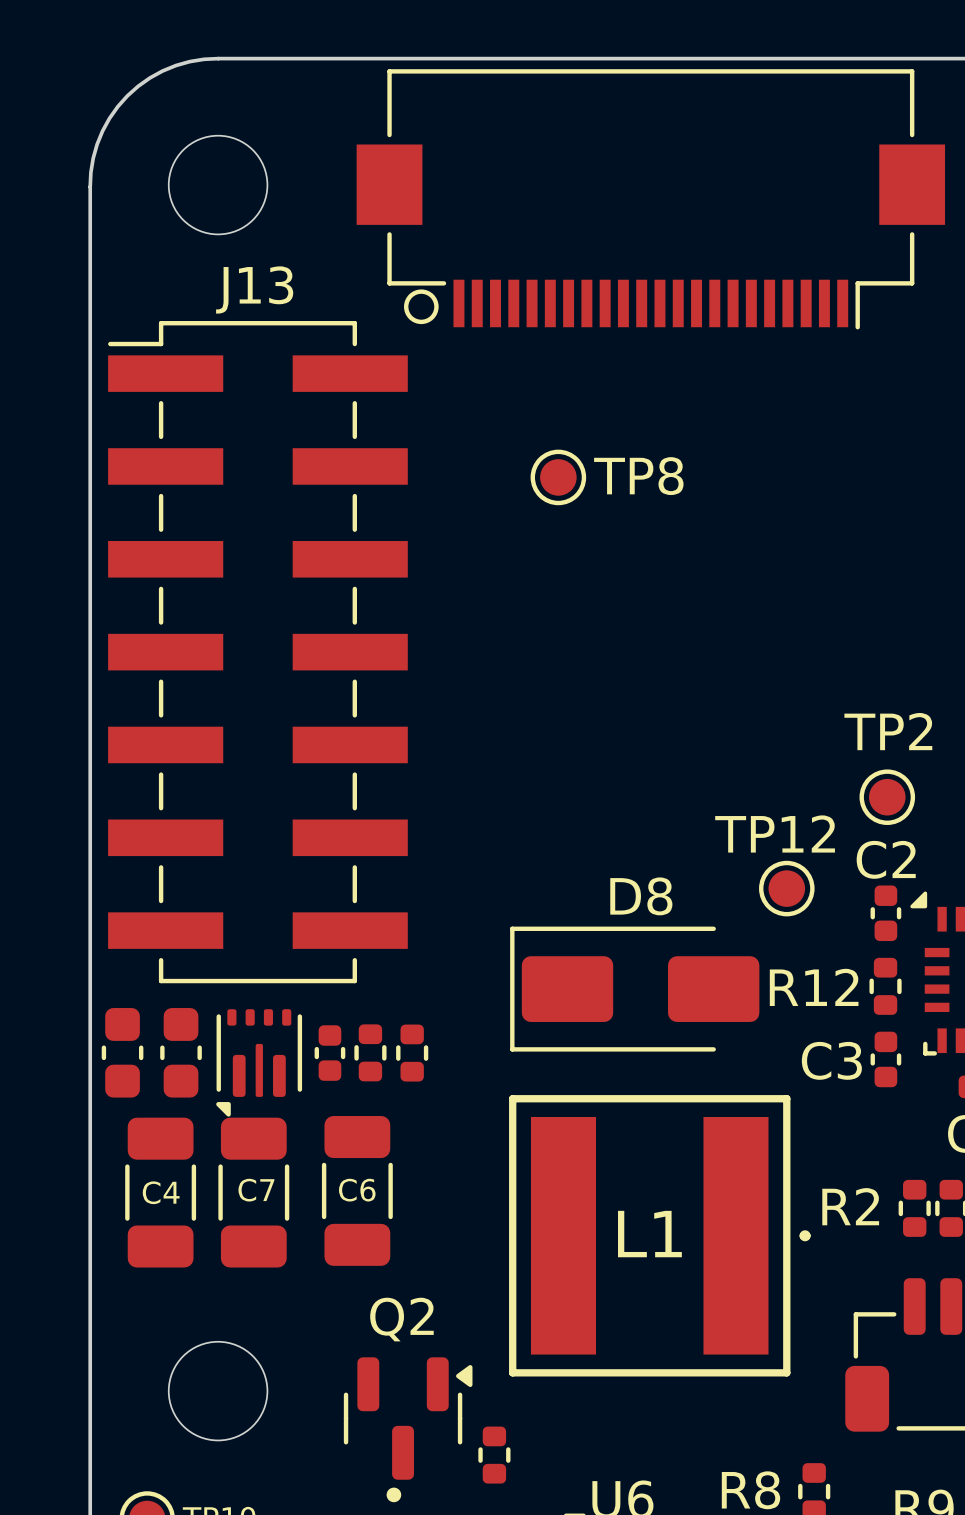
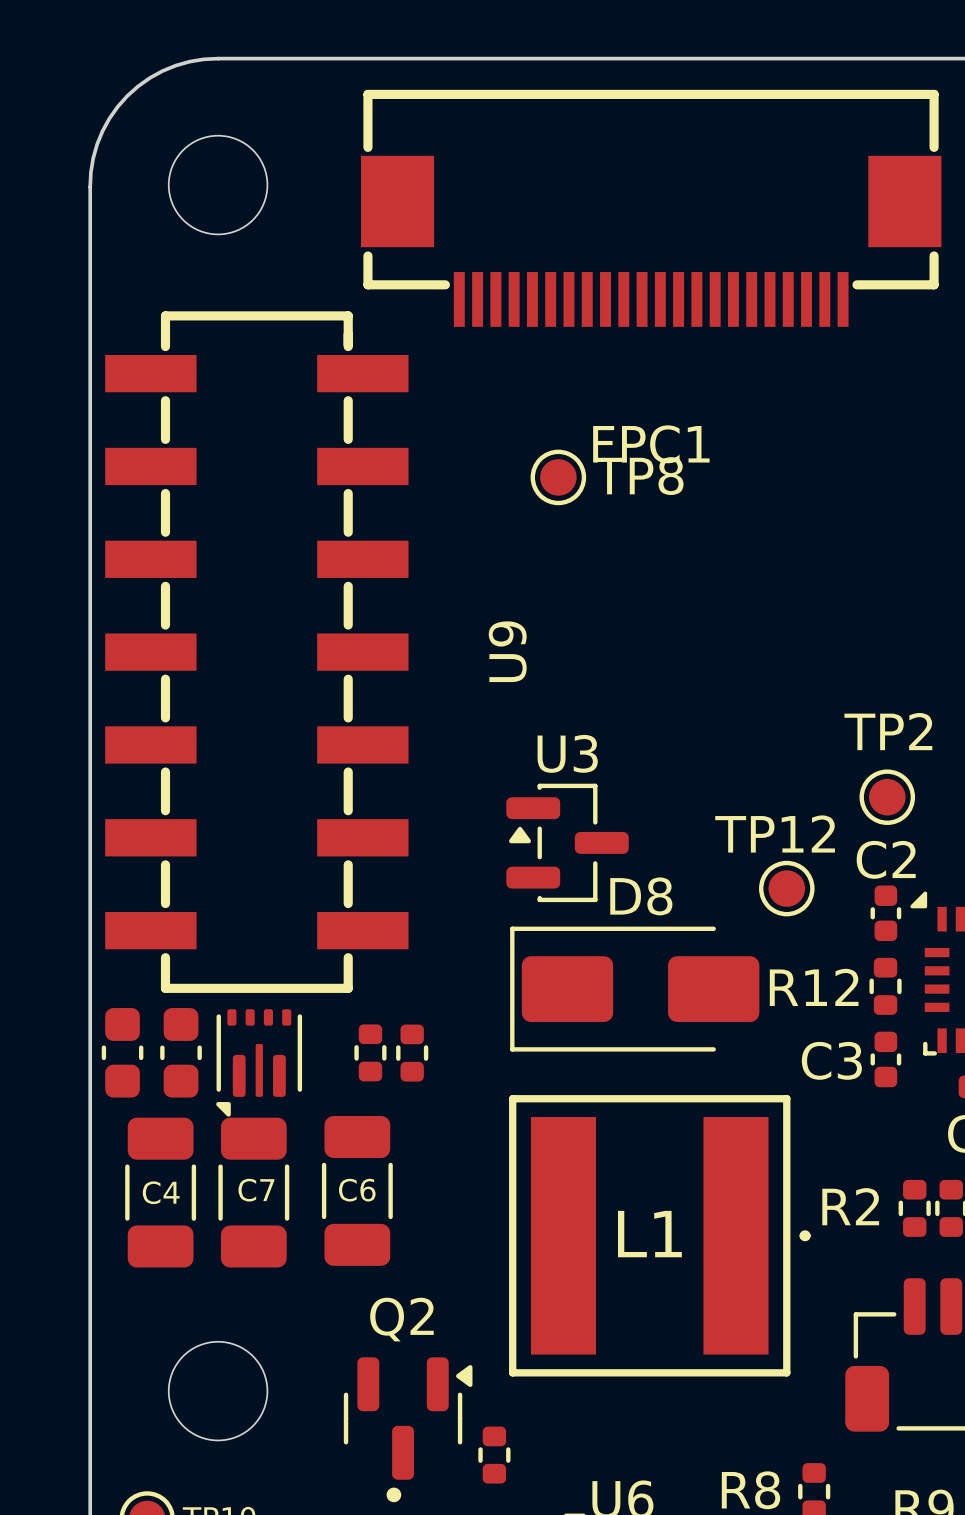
part: (650, 199) -> none
FPC1: none -> (651, 208)
U9: none -> (256, 652)
J13: (257, 652) -> none
U3: none -> (567, 842)
part: (329, 1053) -> none

